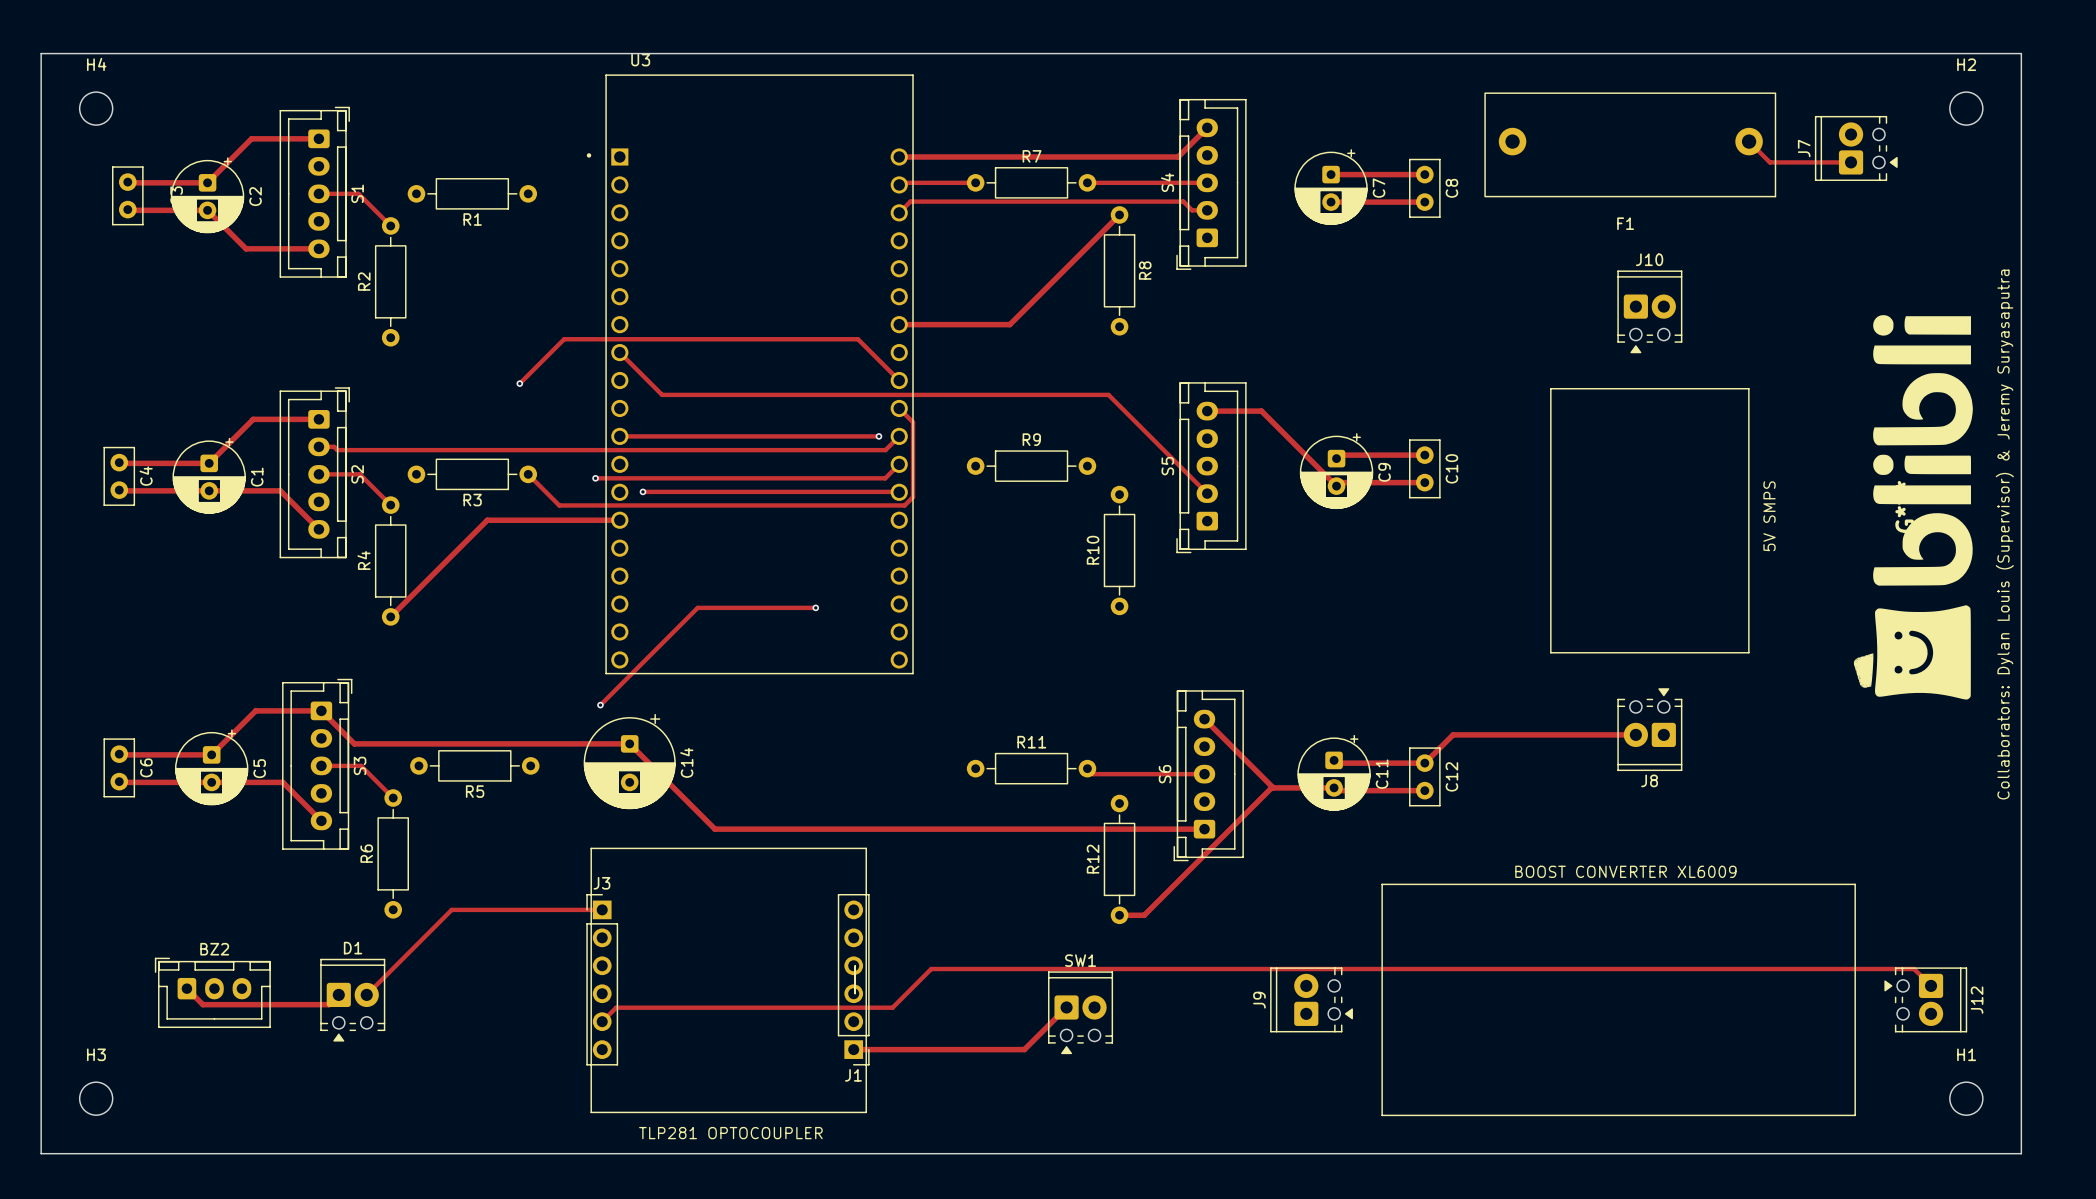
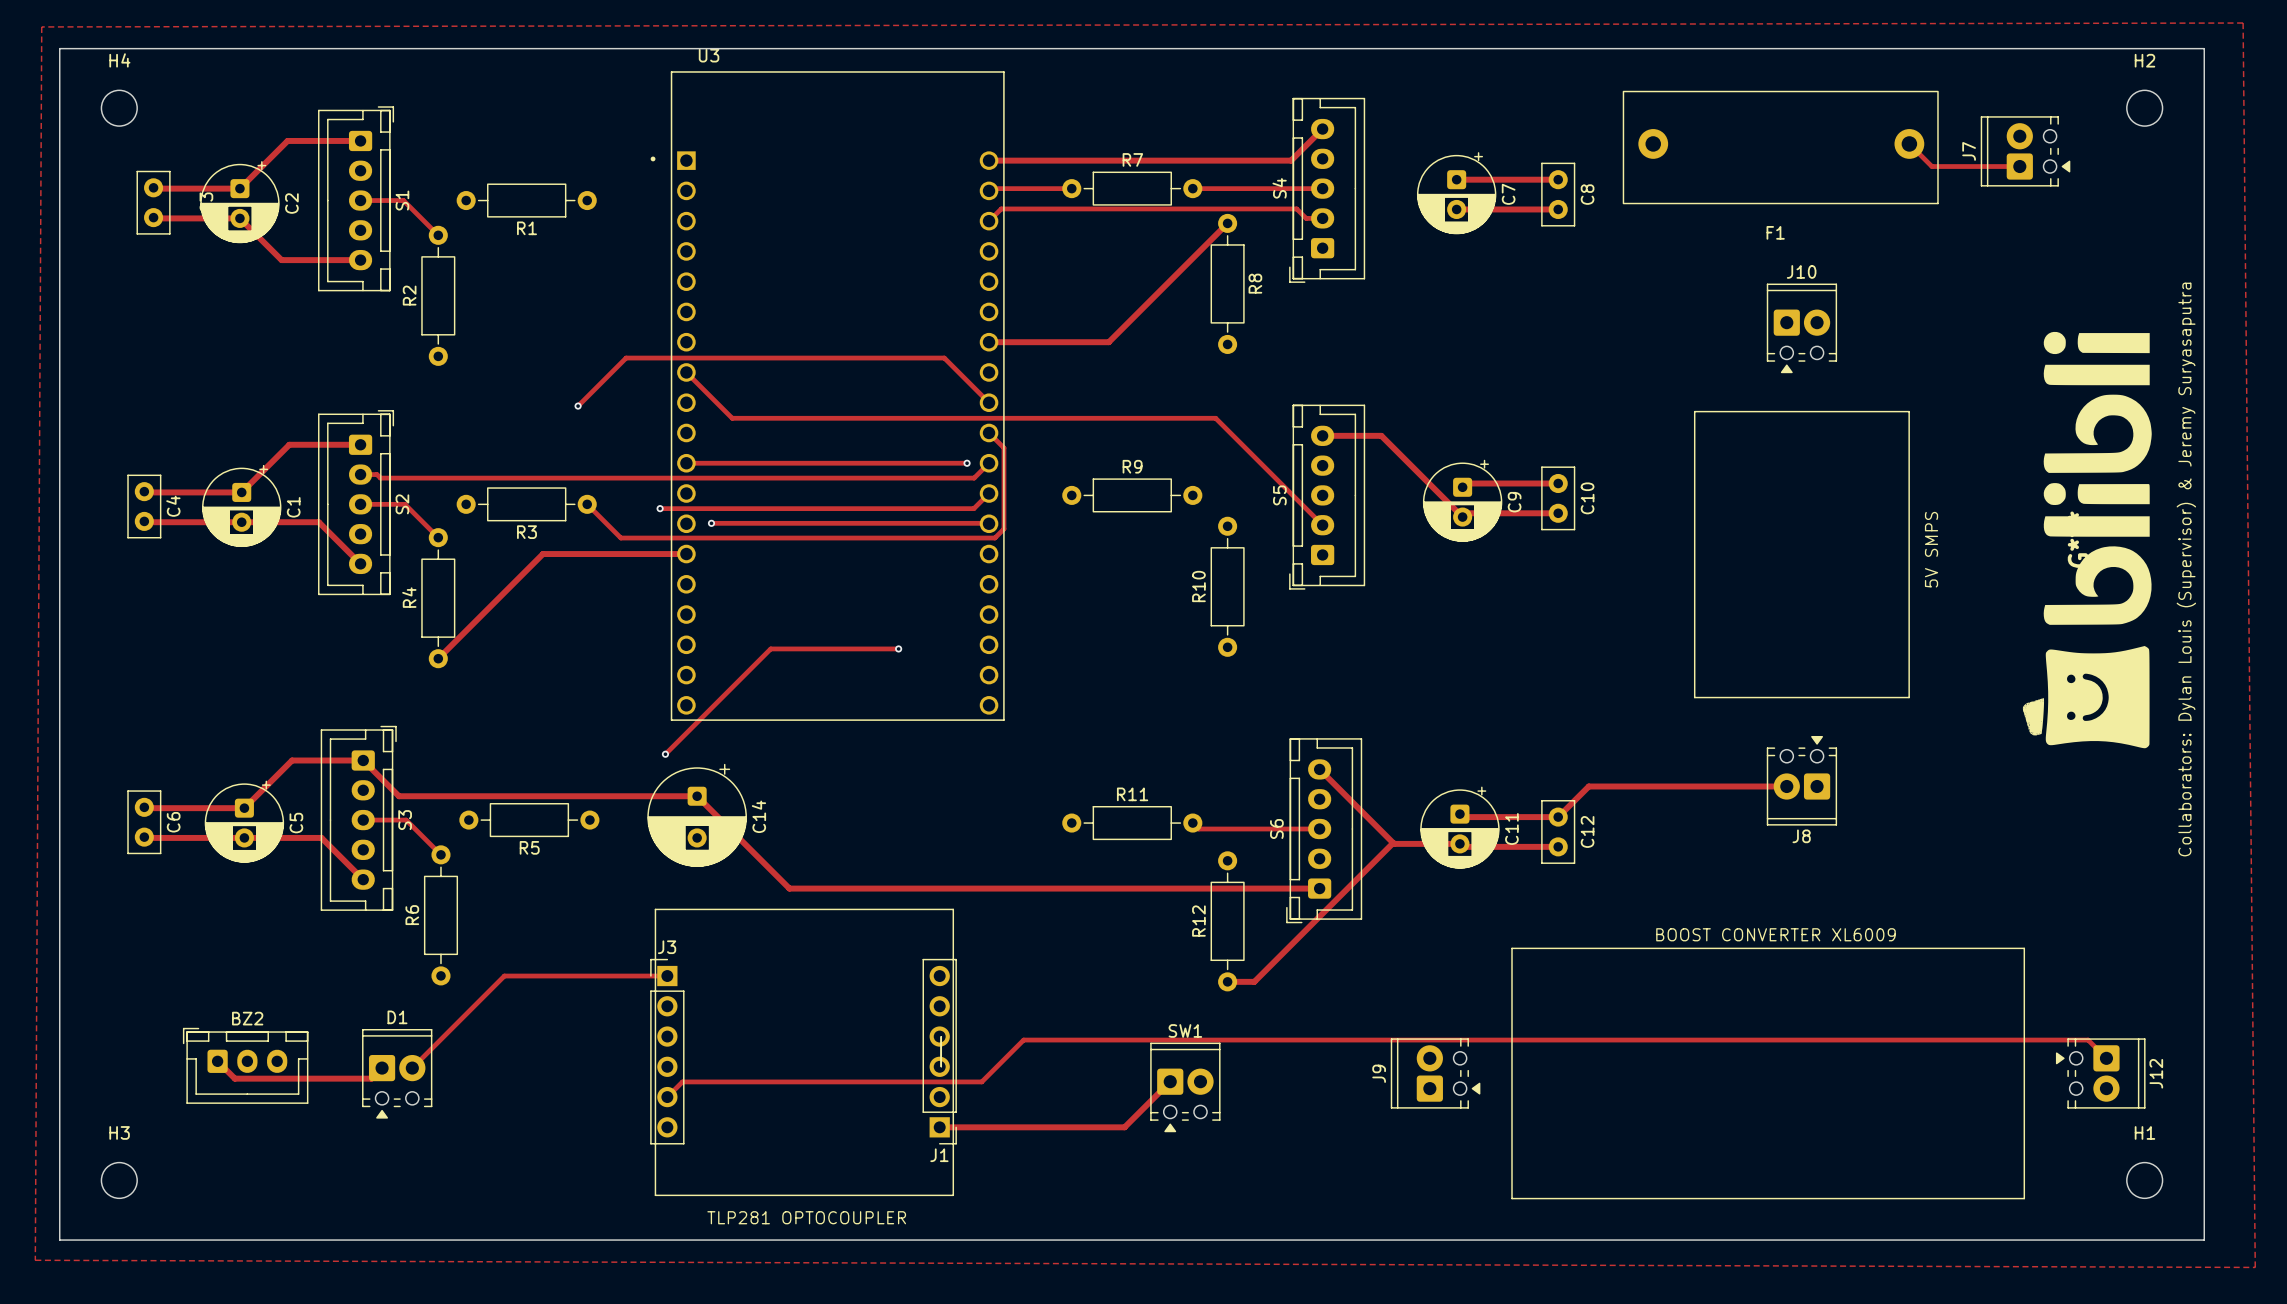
zone outline: none -> (2243, 23) (2255, 1267) (35, 1260) (41, 26) (2243, 23)

